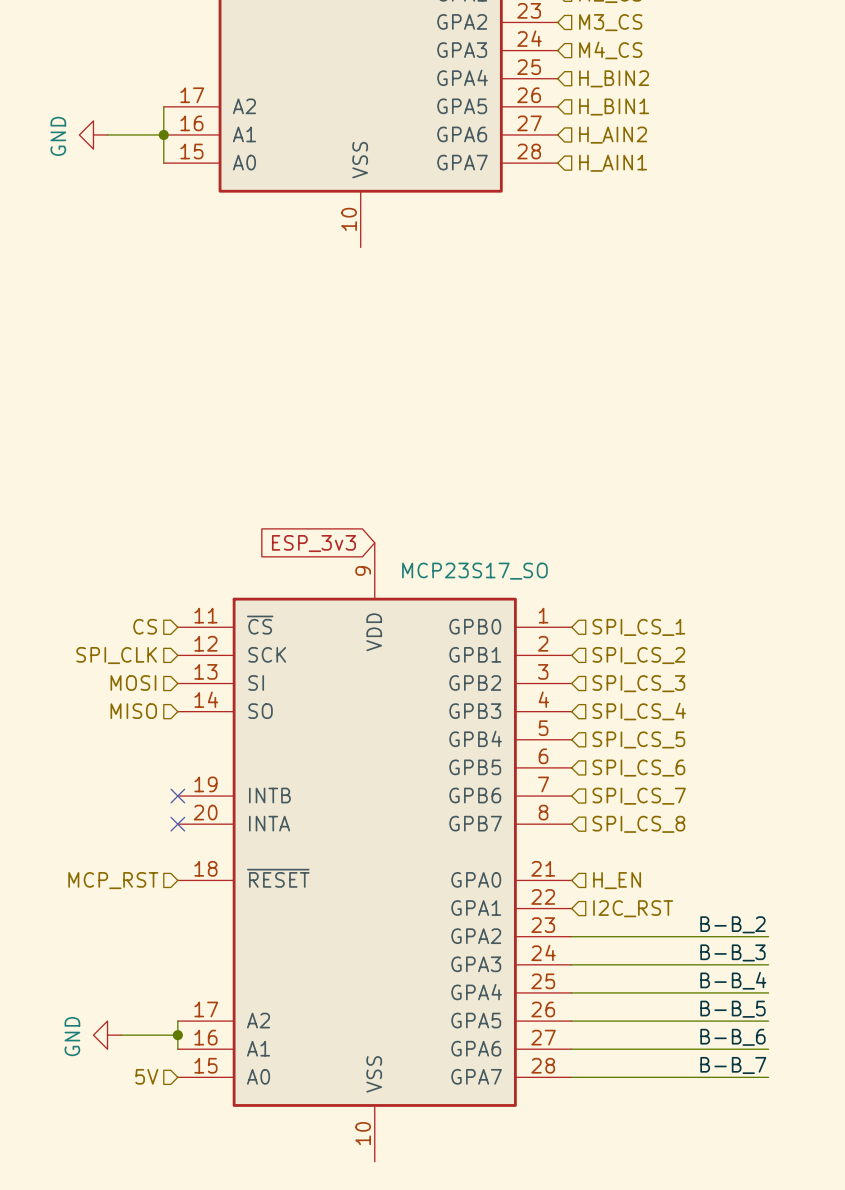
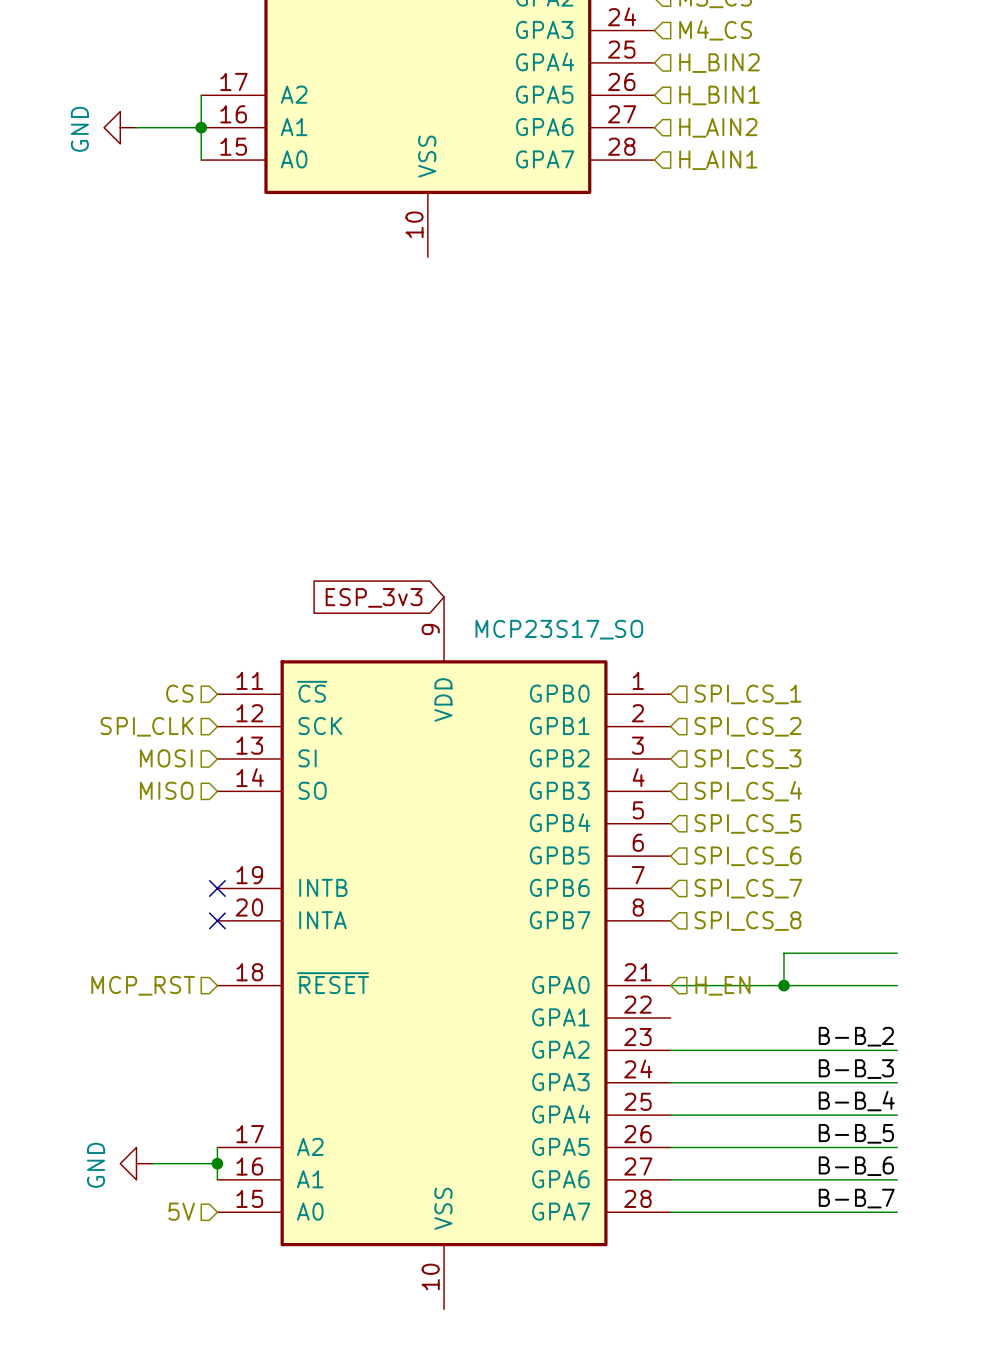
wire: none -> (897, 953) (783, 953) (783, 985)
wire: none -> (670, 985) (897, 985)
junction: none -> (783, 985)
hierarchical label: I2C_RST (633, 908) -> none

